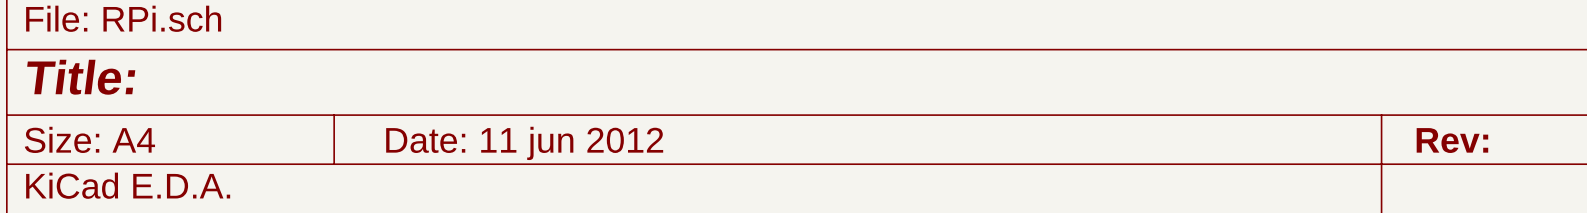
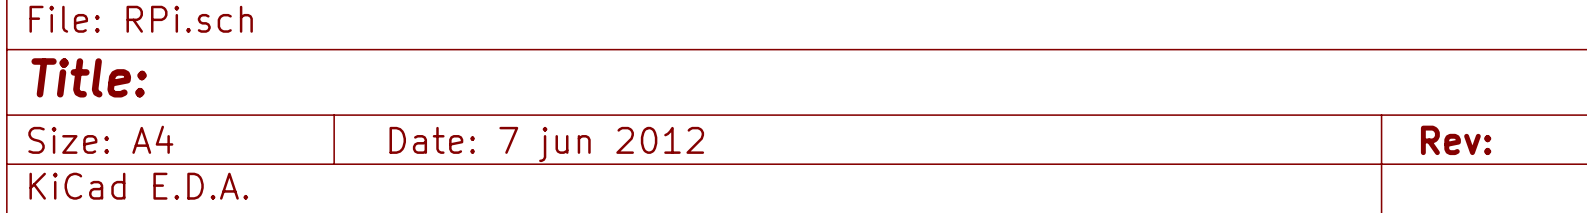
title block: Date: 11 jun 2012 (524, 143) -> Date: 7 jun 2012 (546, 144)

